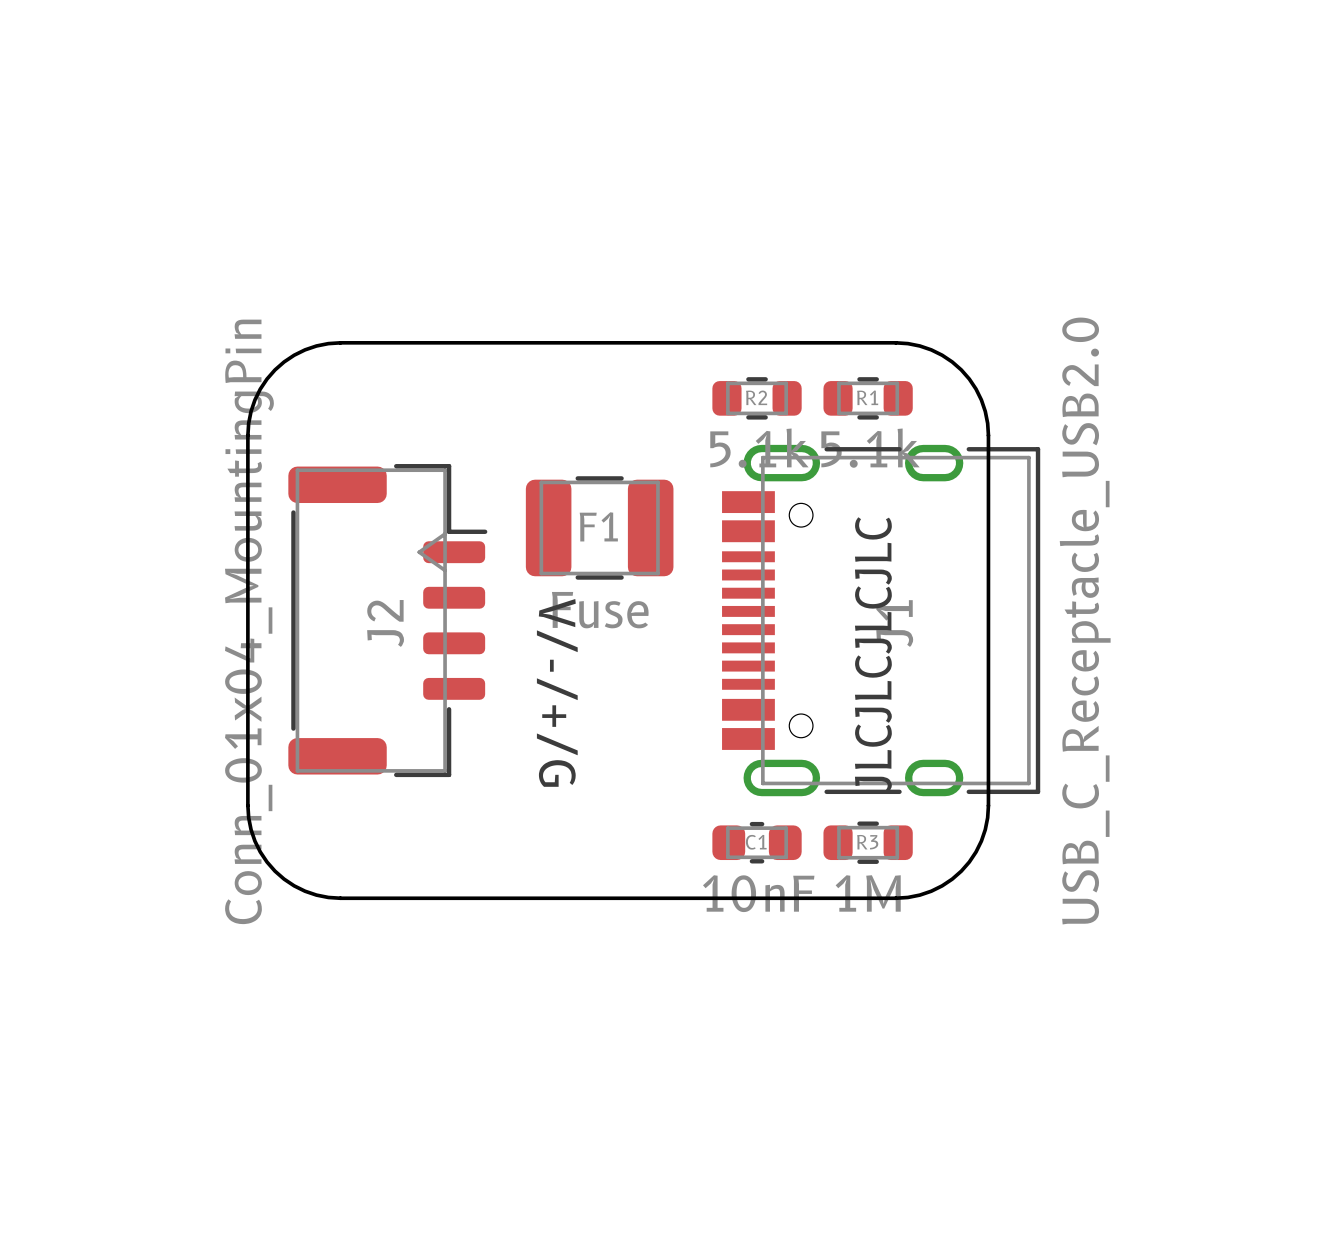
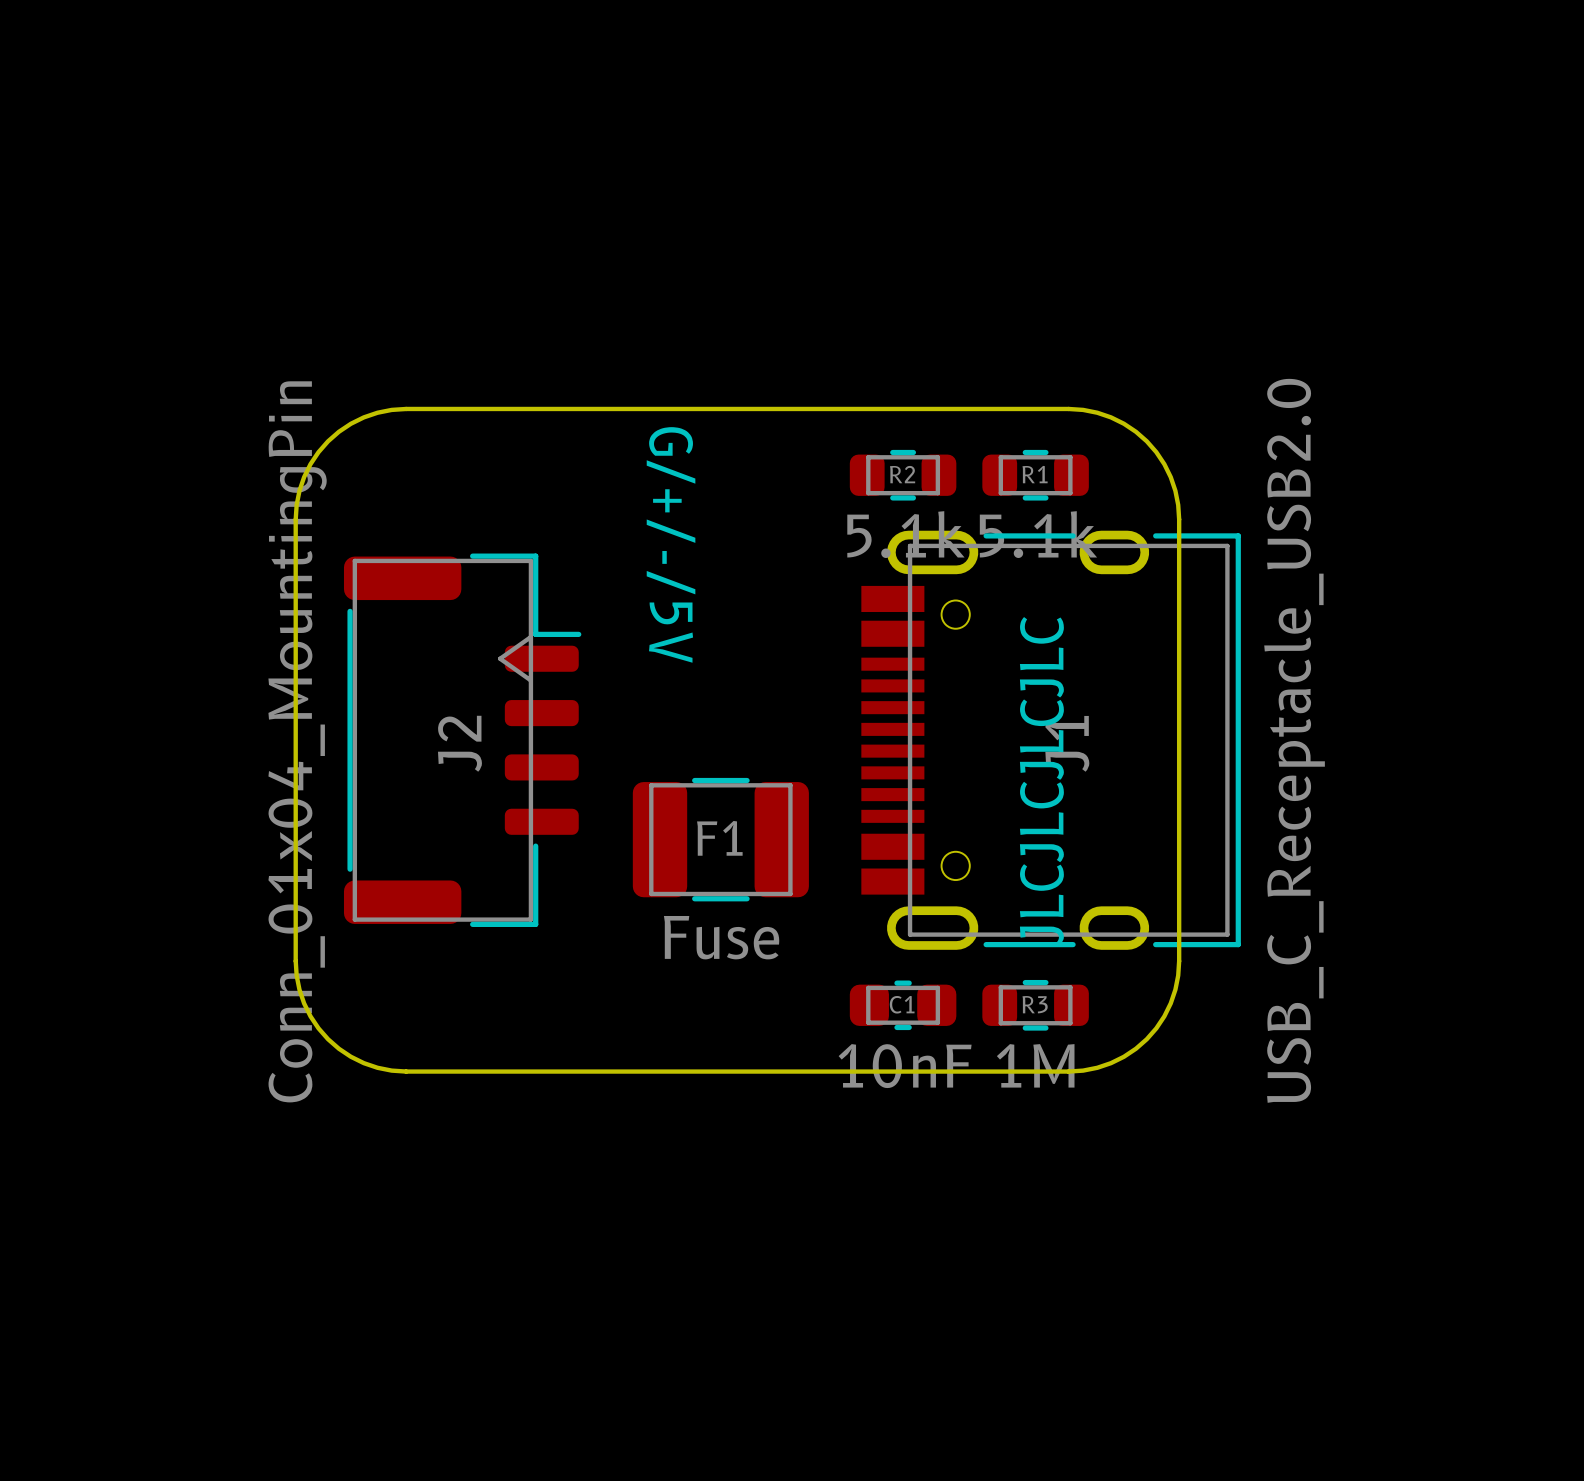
text: none -> G/+/-/5V (671, 544)
F1 position: (599, 527) -> (720, 839)
text: V/-/+/G (557, 692) -> none

